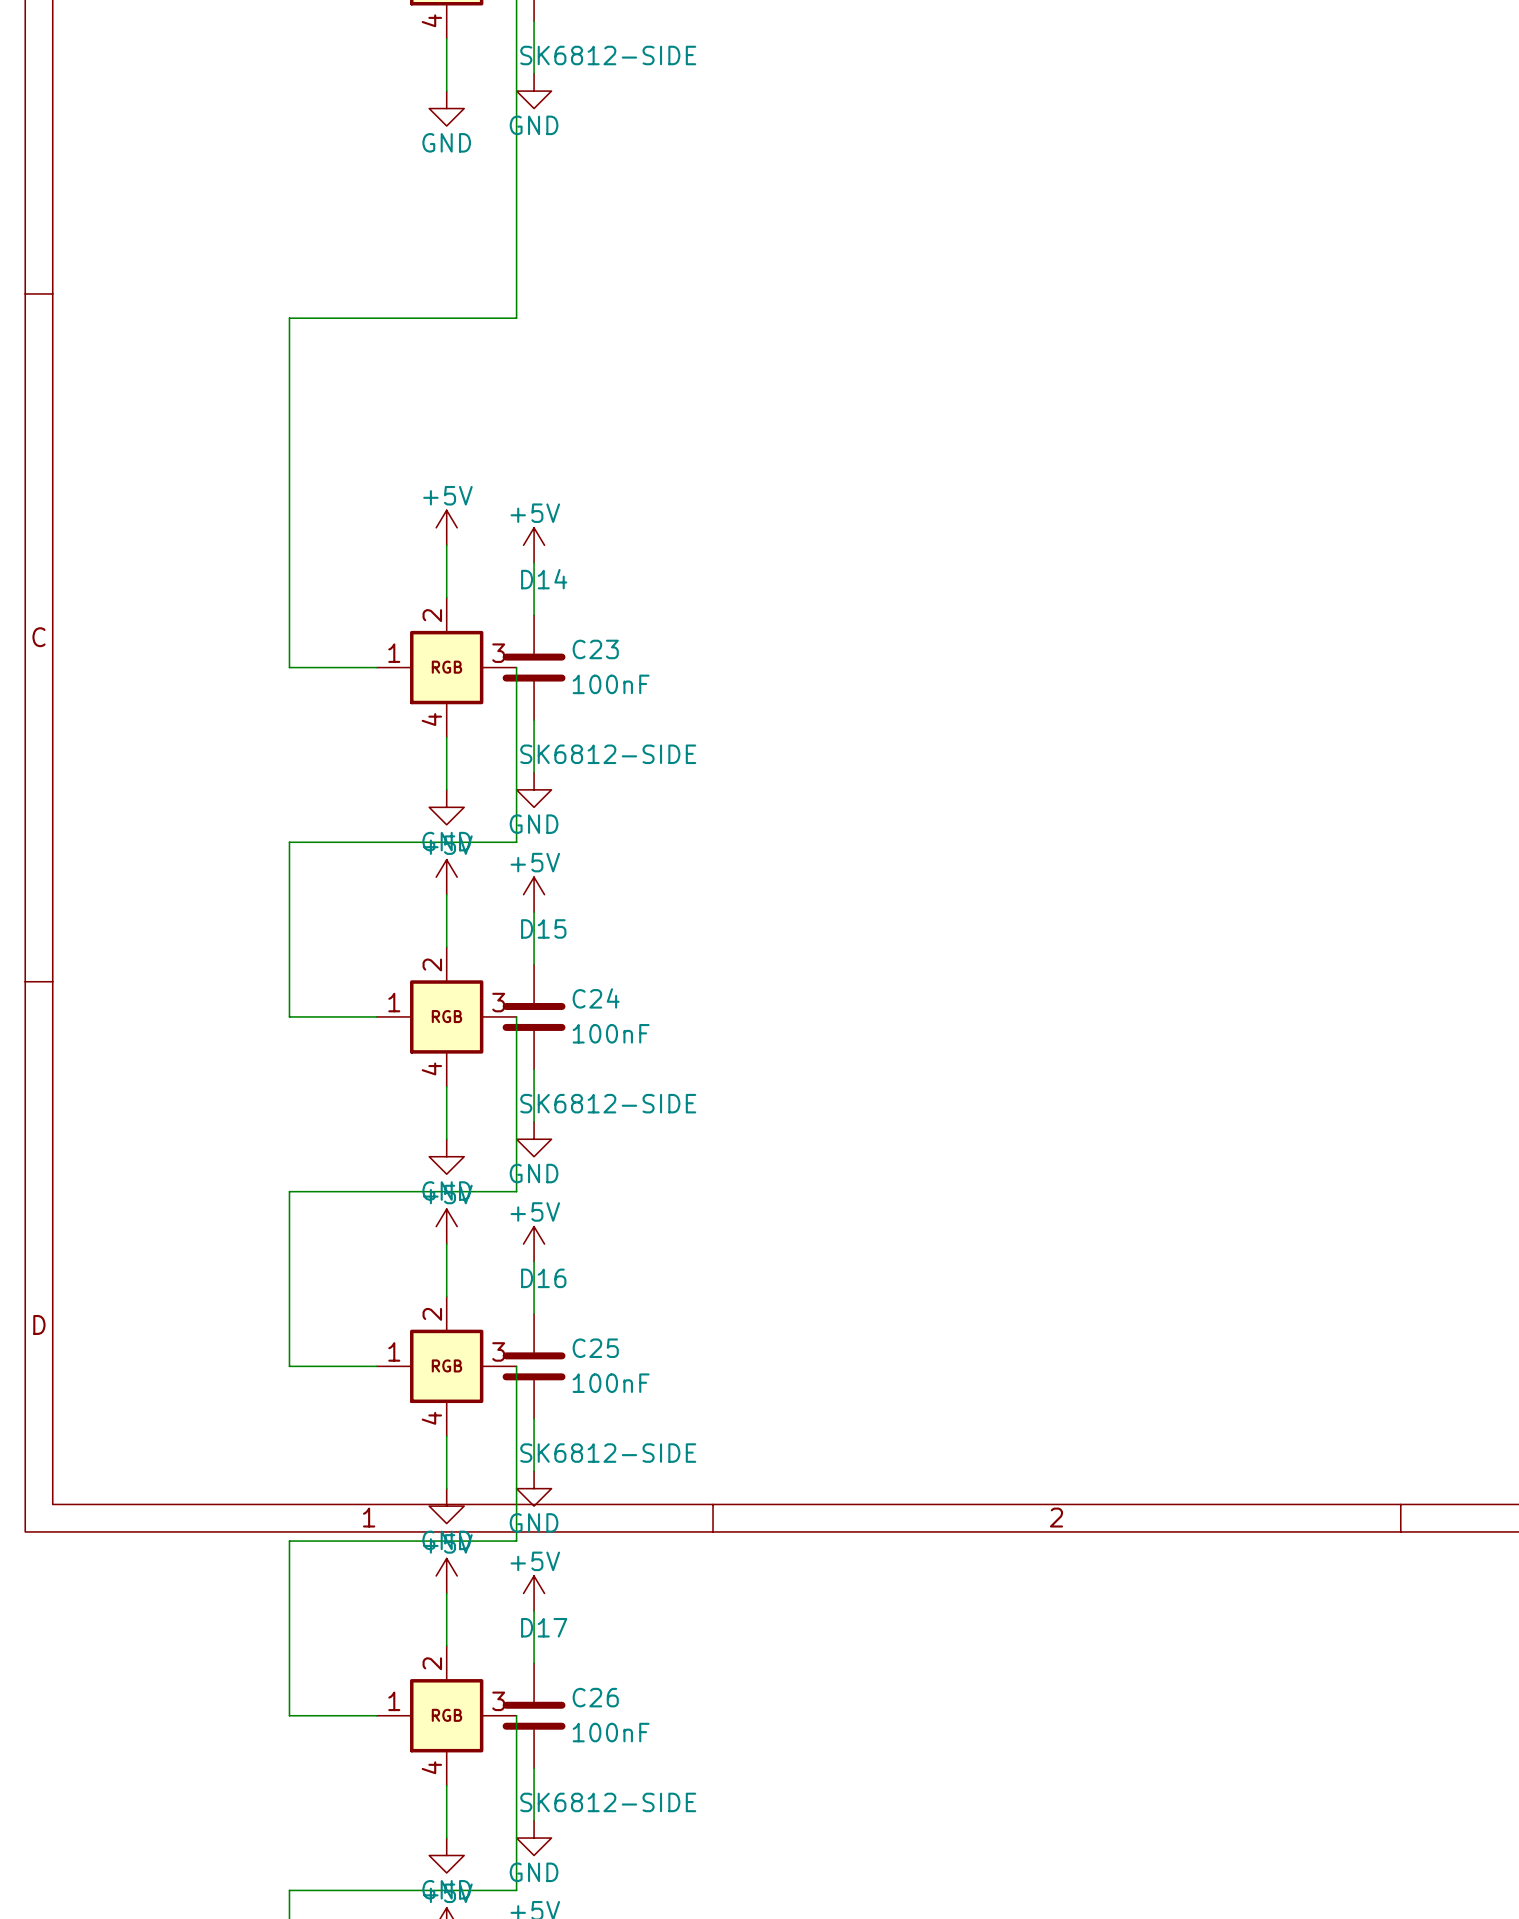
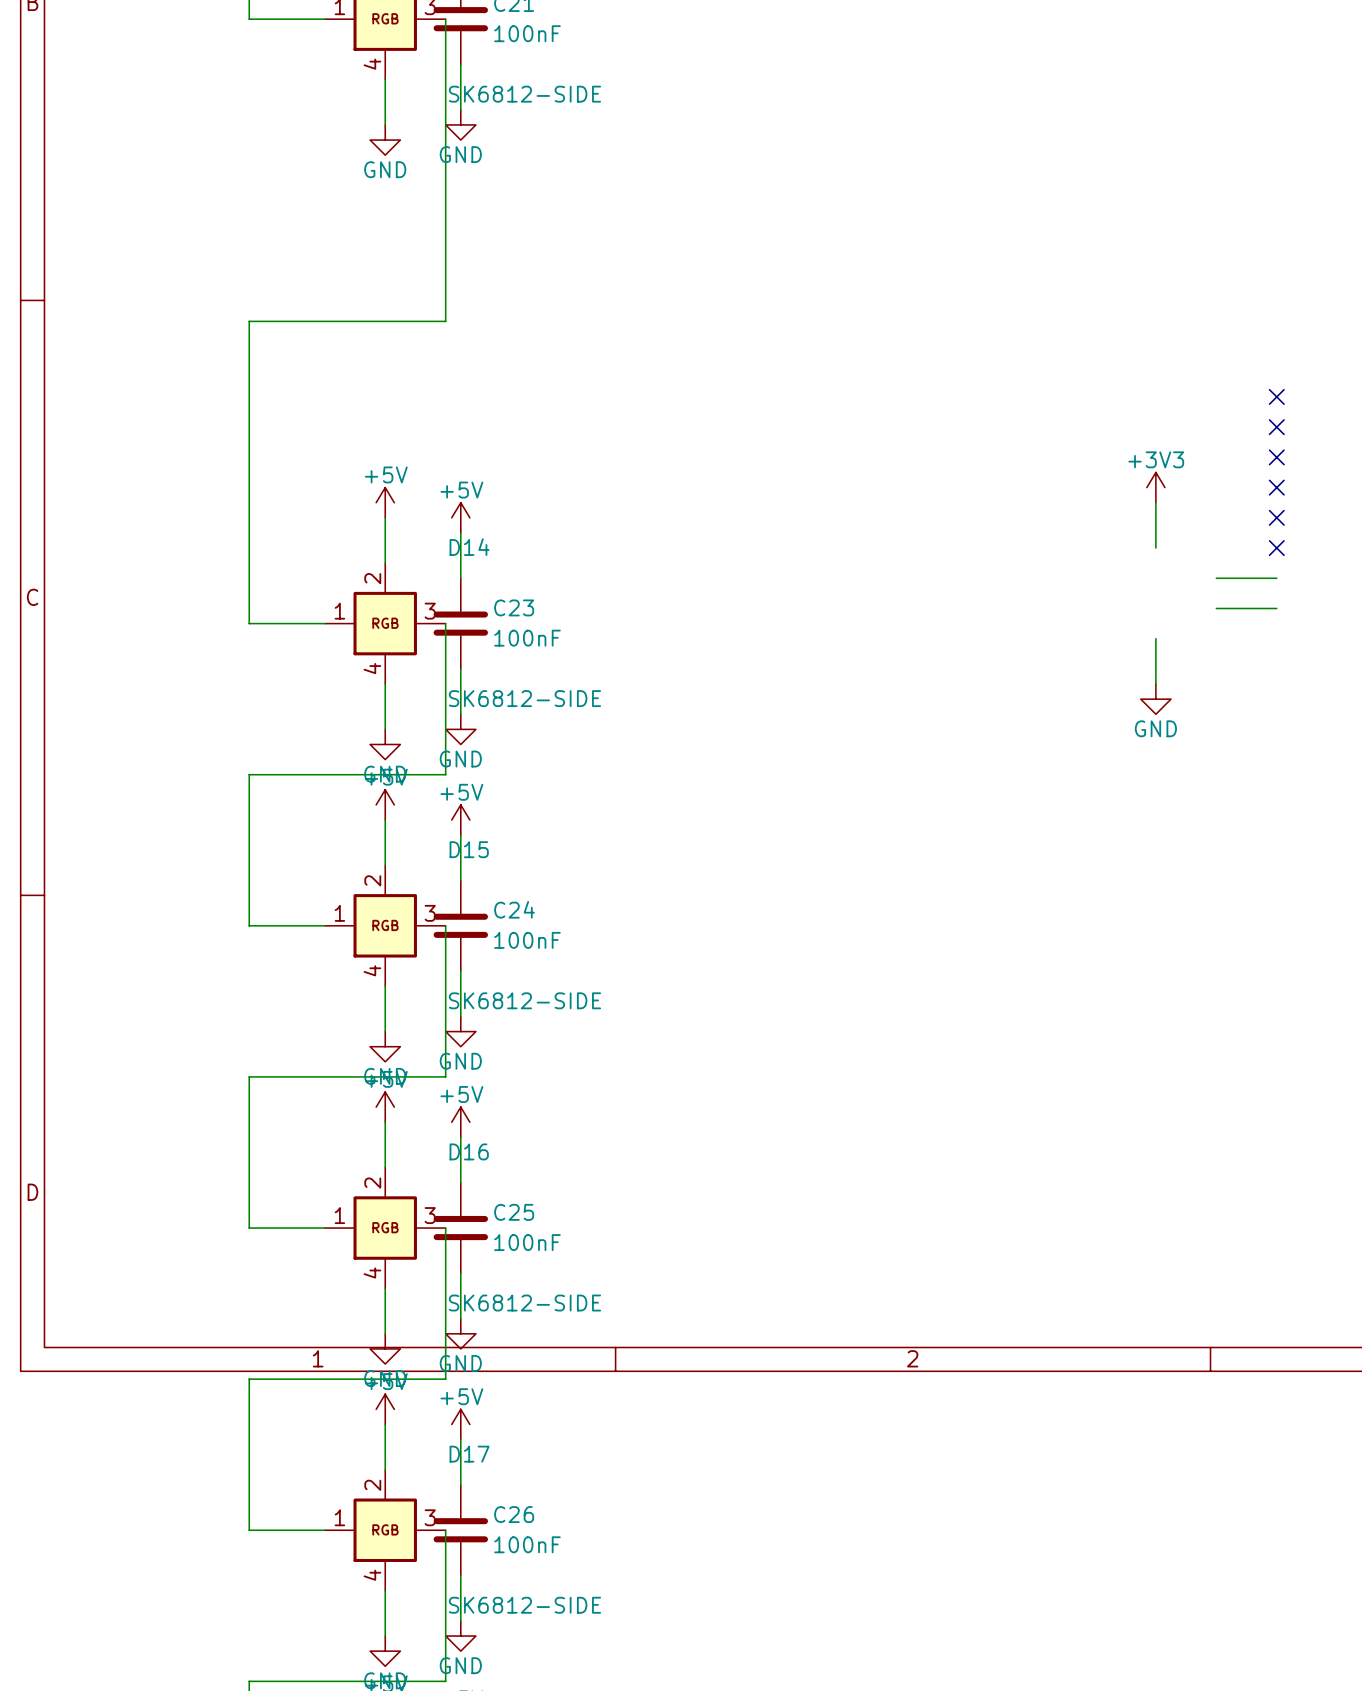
no-connect mark: none -> (1276, 396)
no-connect mark: none -> (1276, 427)
no-connect mark: none -> (1276, 457)
power symbol: none -> +3V3 (1155, 487)
no-connect mark: none -> (1276, 487)
wire: none -> (1155, 502) (1155, 548)
no-connect mark: none -> (1276, 517)
no-connect mark: none -> (1276, 548)
wire: none -> (1216, 578) (1276, 578)
wire: none -> (1216, 608) (1276, 608)
wire: none -> (1155, 638) (1155, 684)
power symbol: none -> GND (1155, 699)

